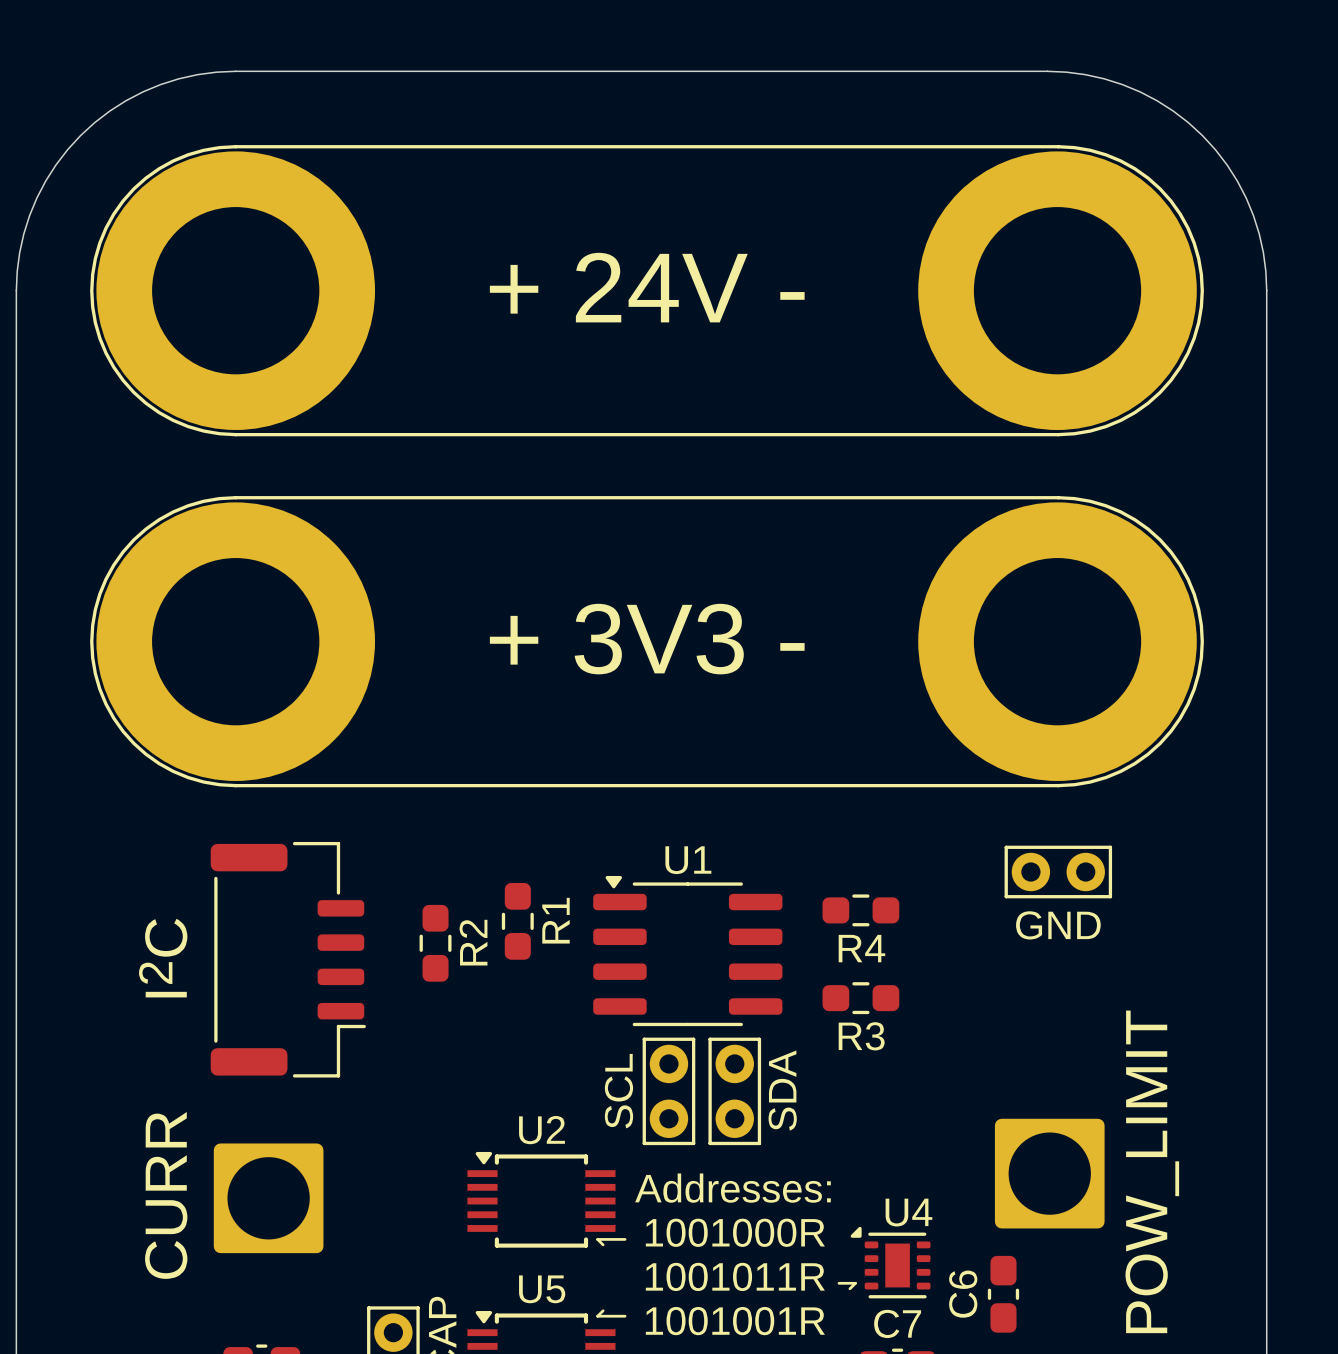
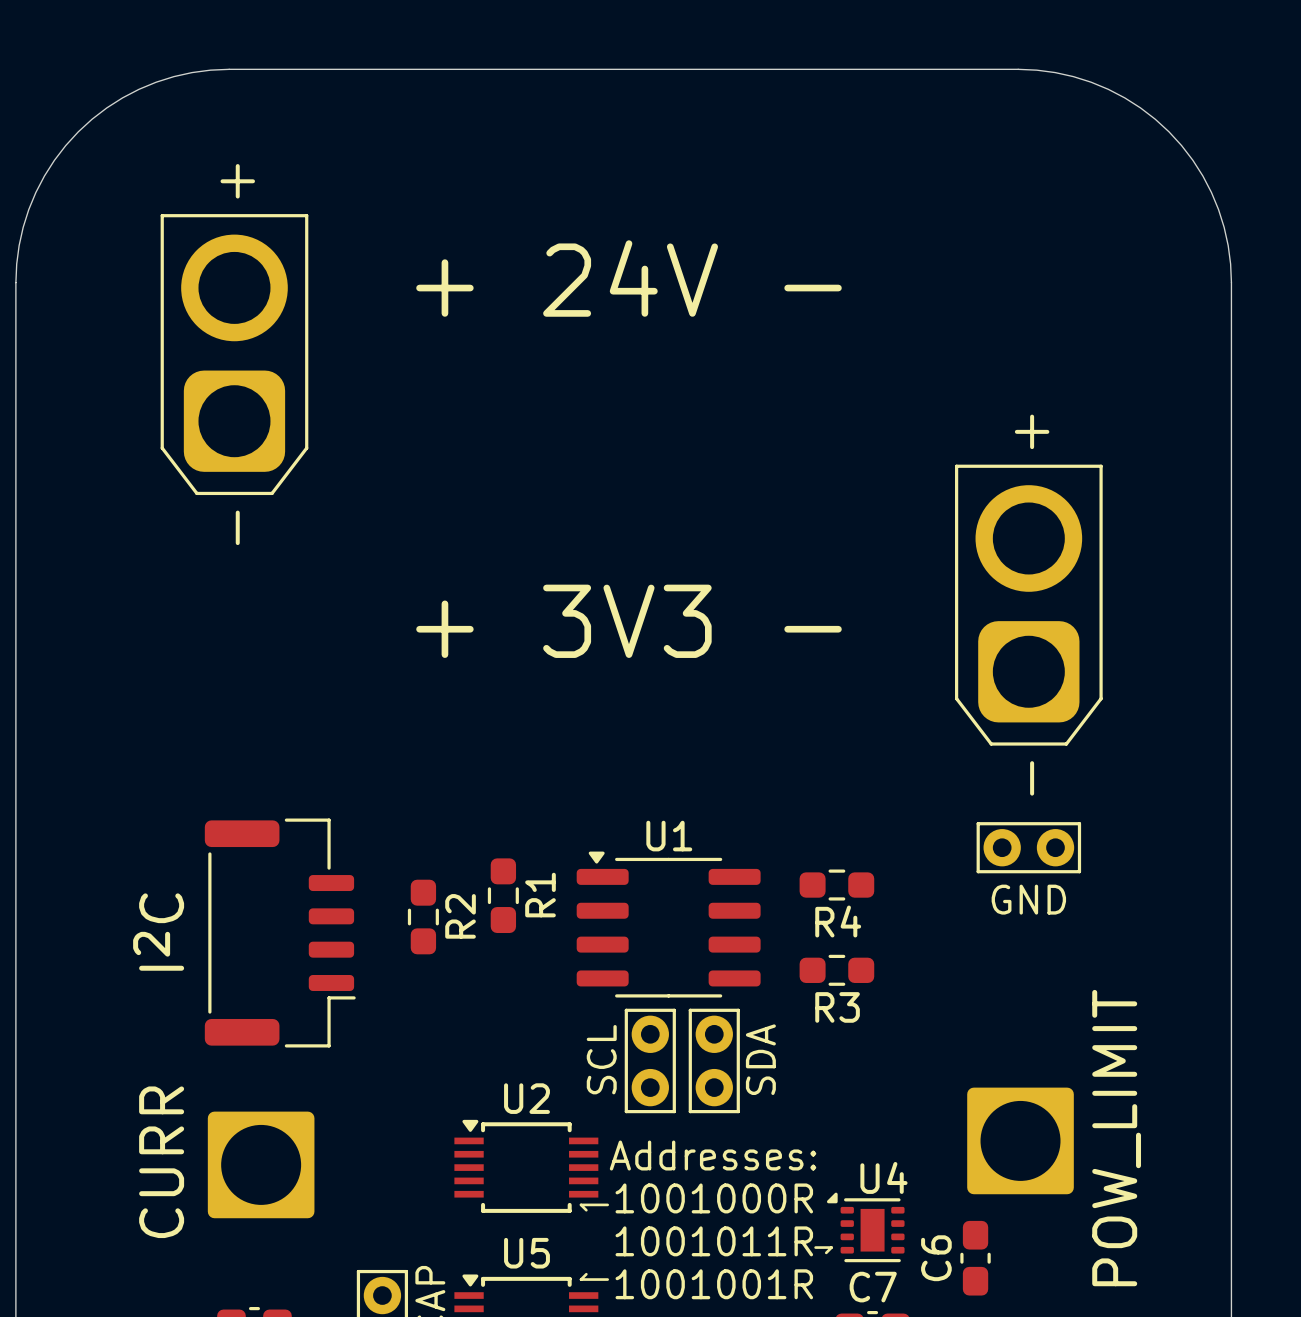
part: (647, 290) -> none
part: none -> (234, 354)
part: none -> (1028, 605)
part: (647, 641) -> none

